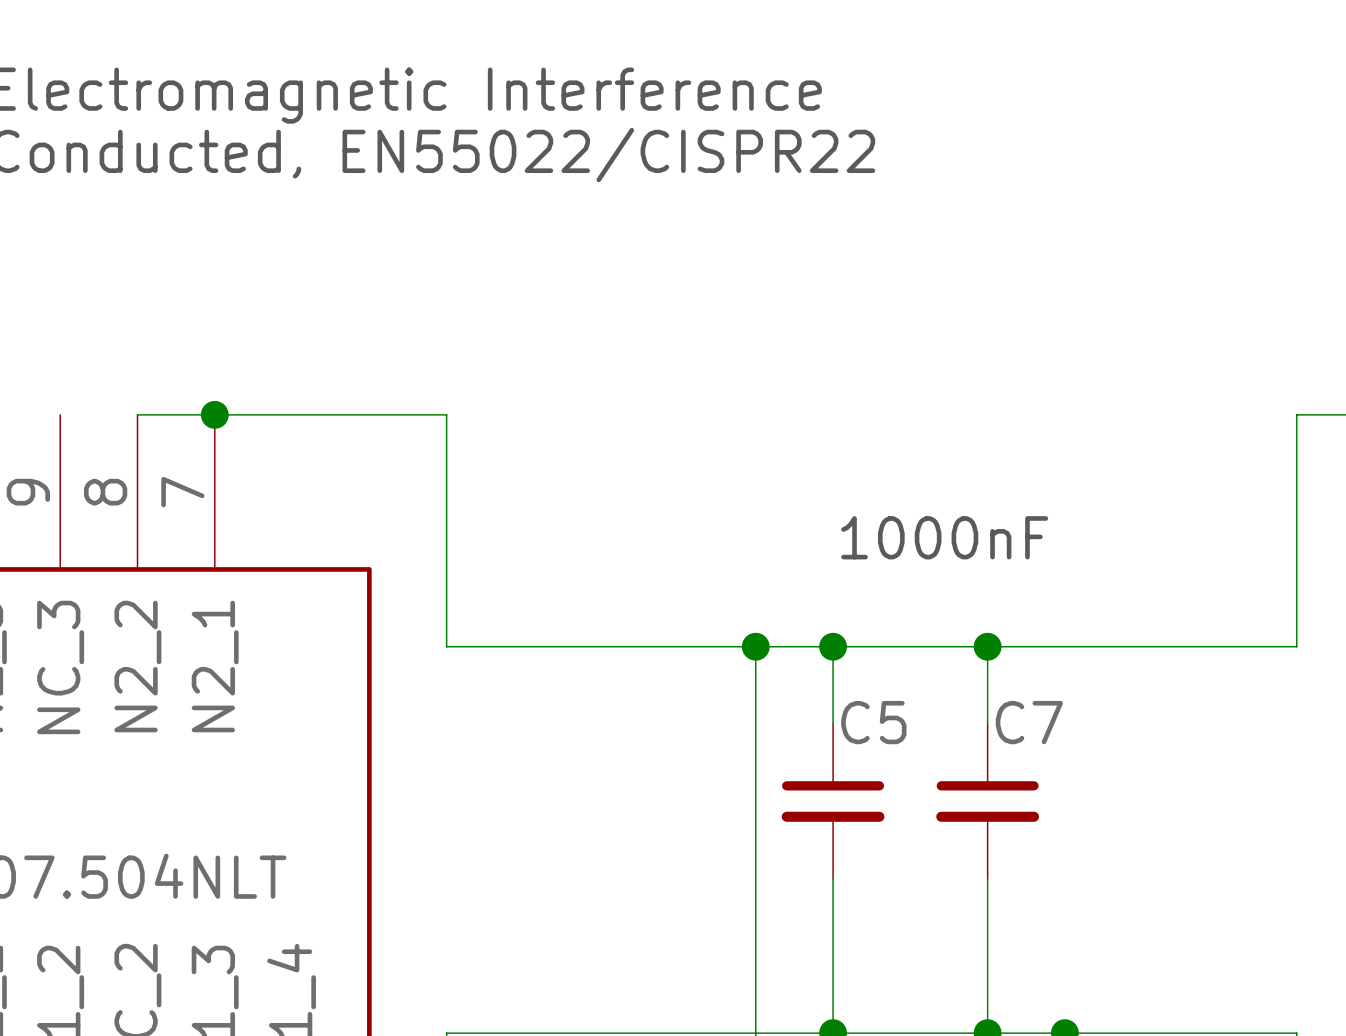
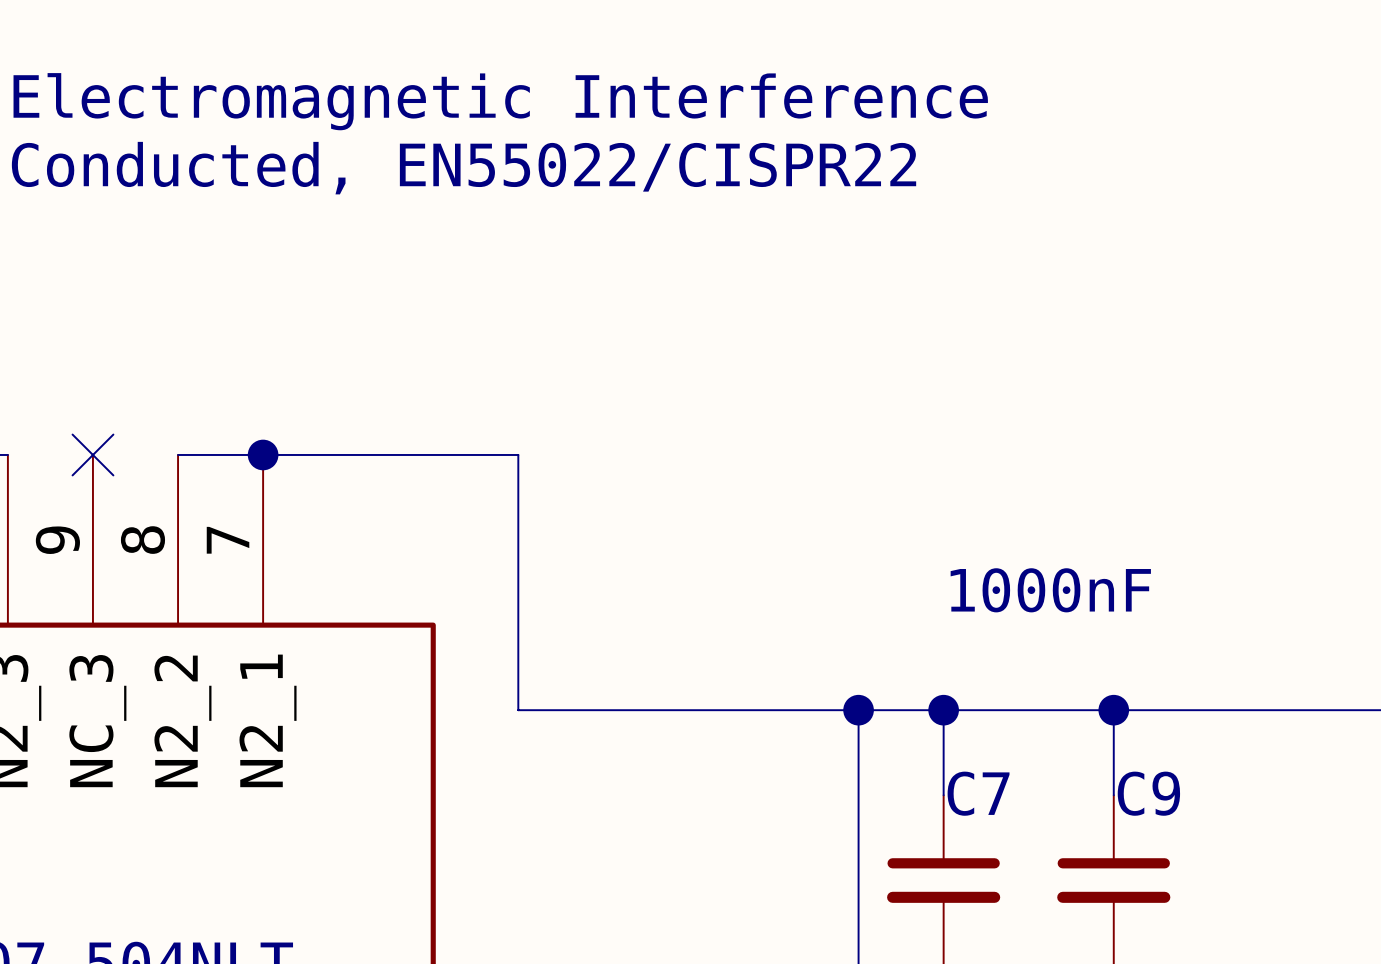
no-connect mark: none -> (92, 454)
C5 name: C5 (873, 722) -> C7 (978, 793)
C7 name: C7 (1029, 722) -> C9 (1148, 793)

